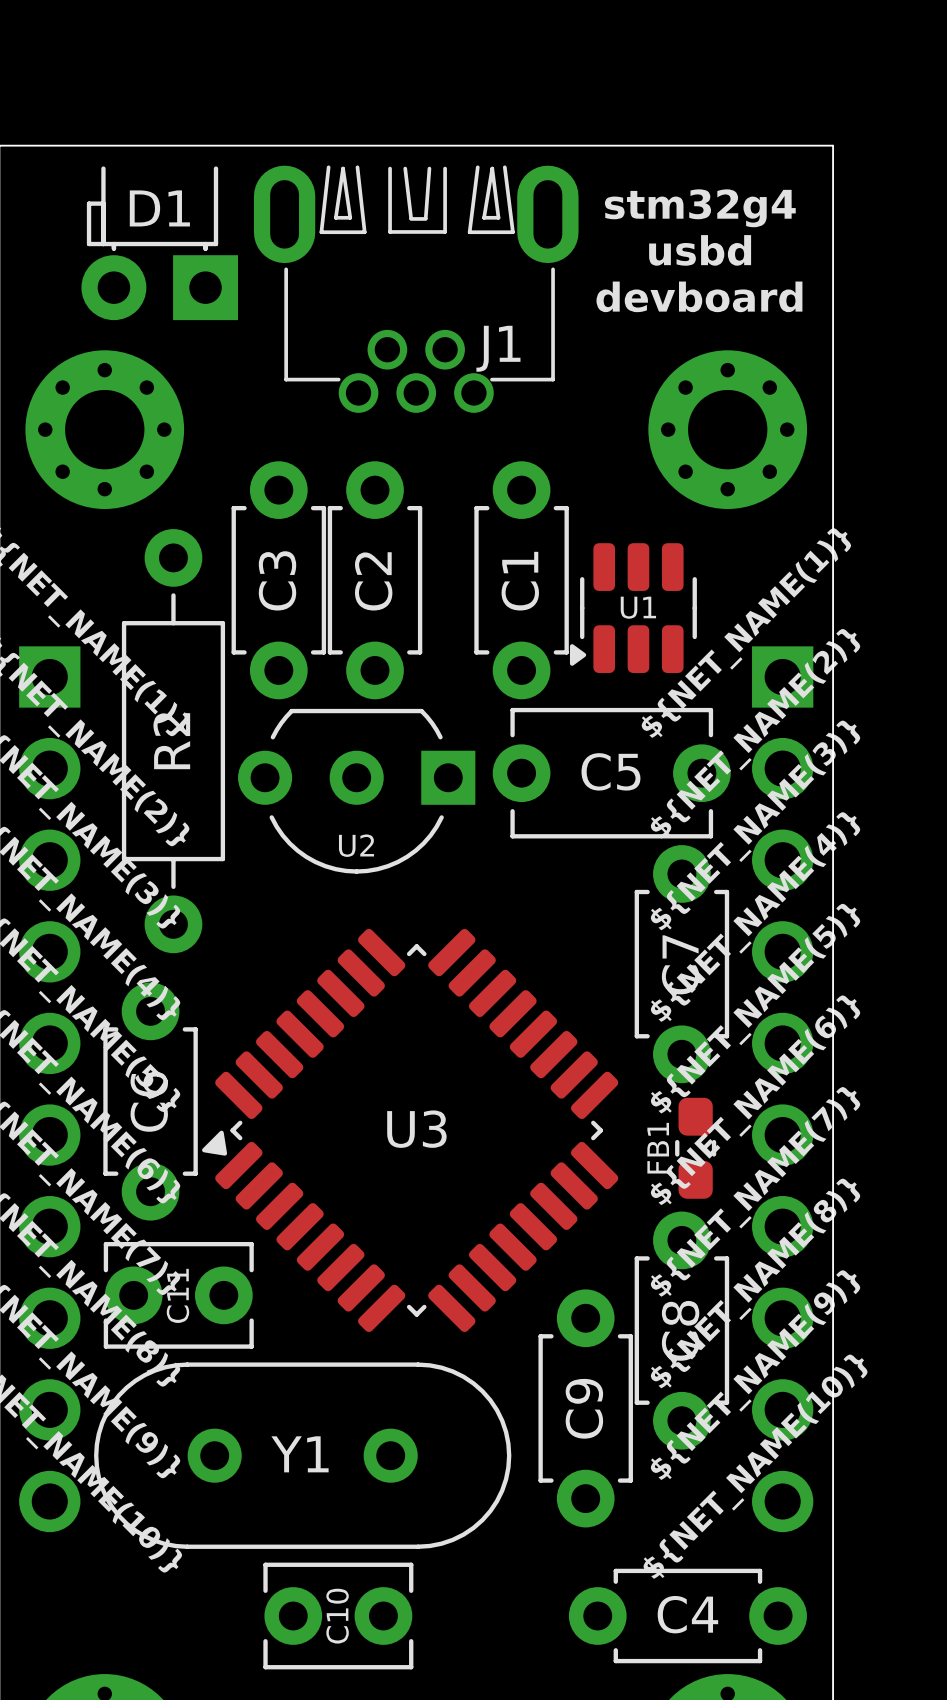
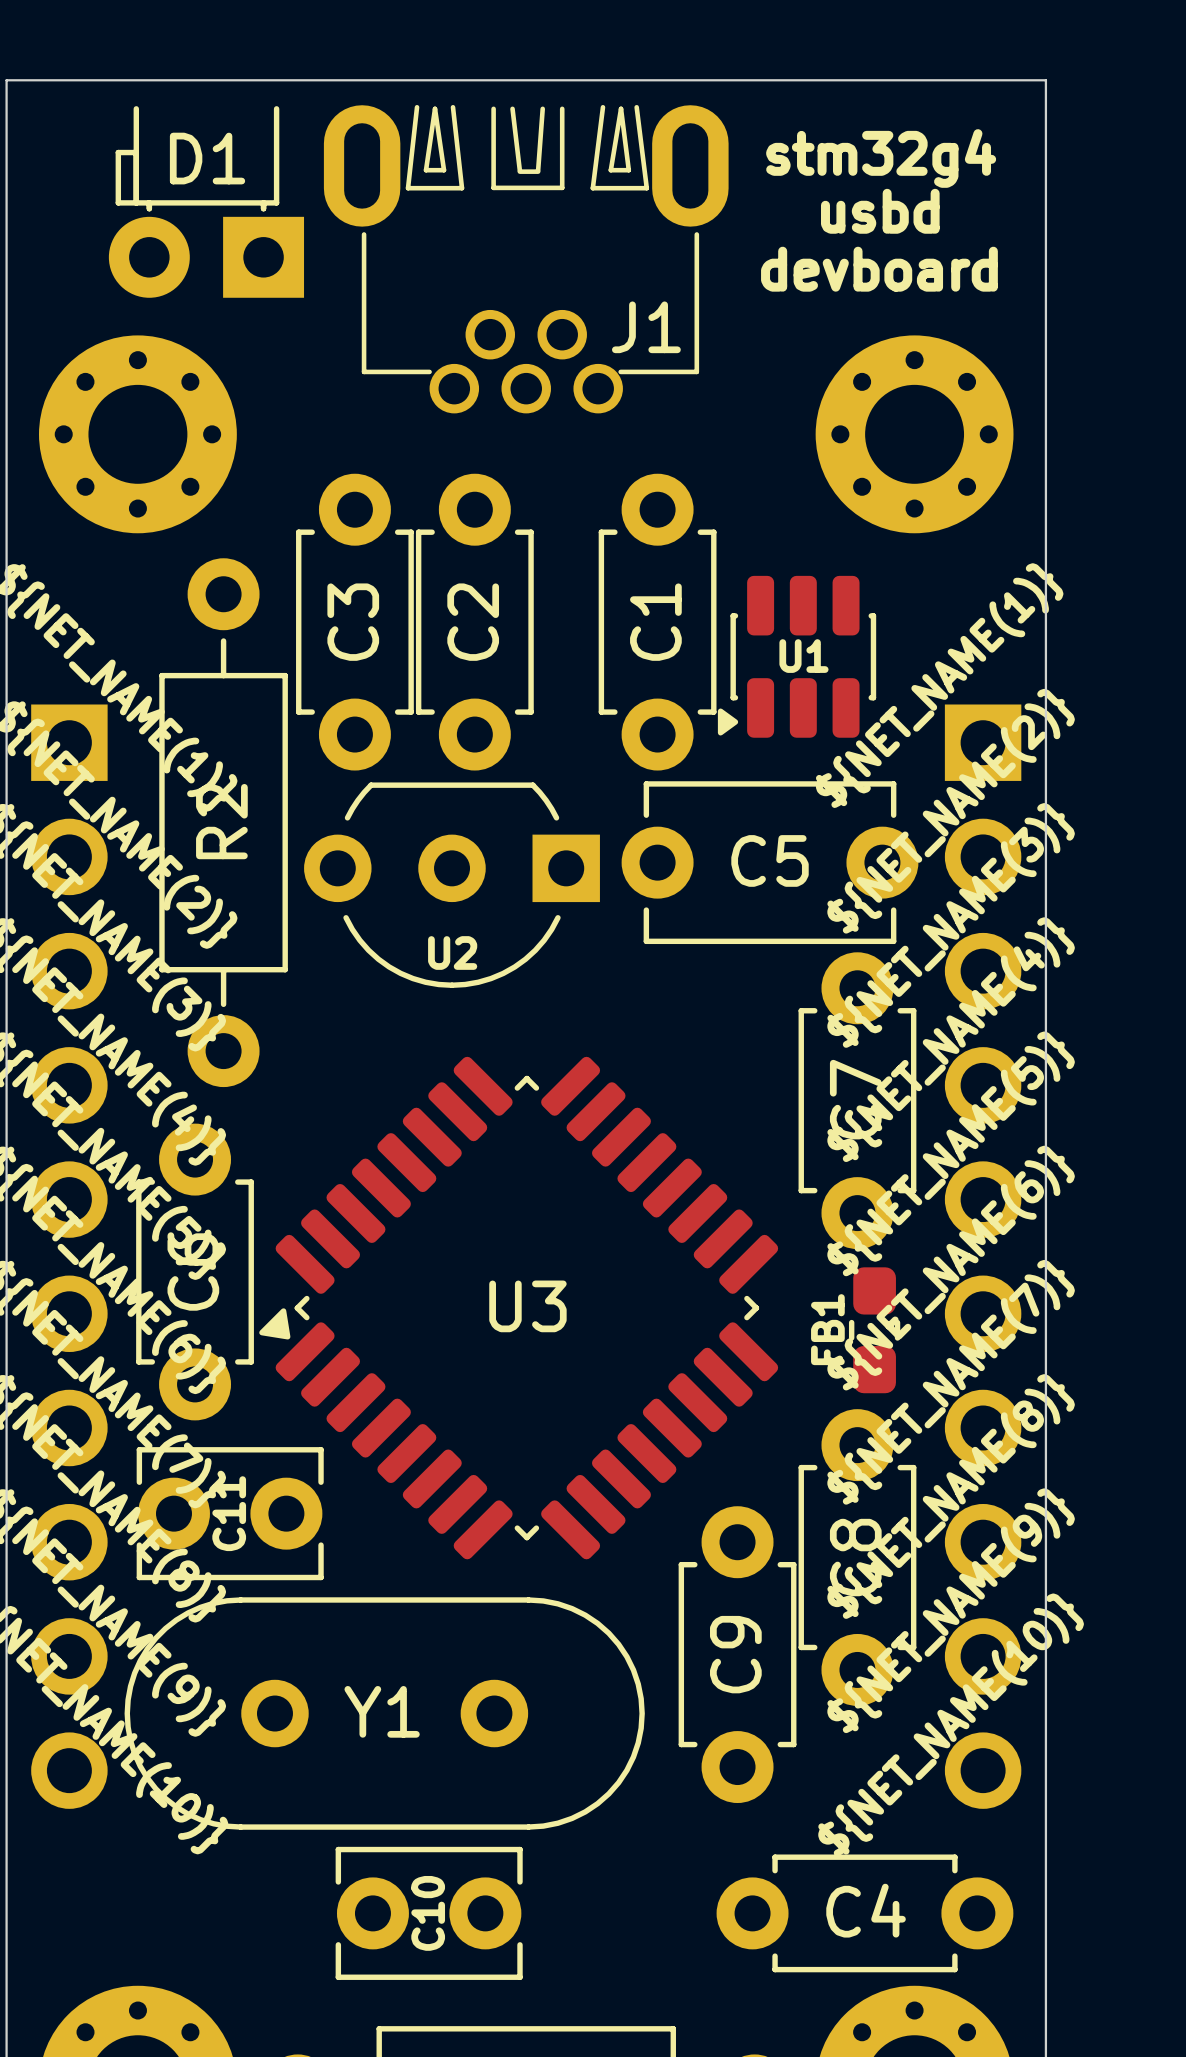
U1 footprint: [569, 543, 697, 674] -> [717, 575, 877, 738]

